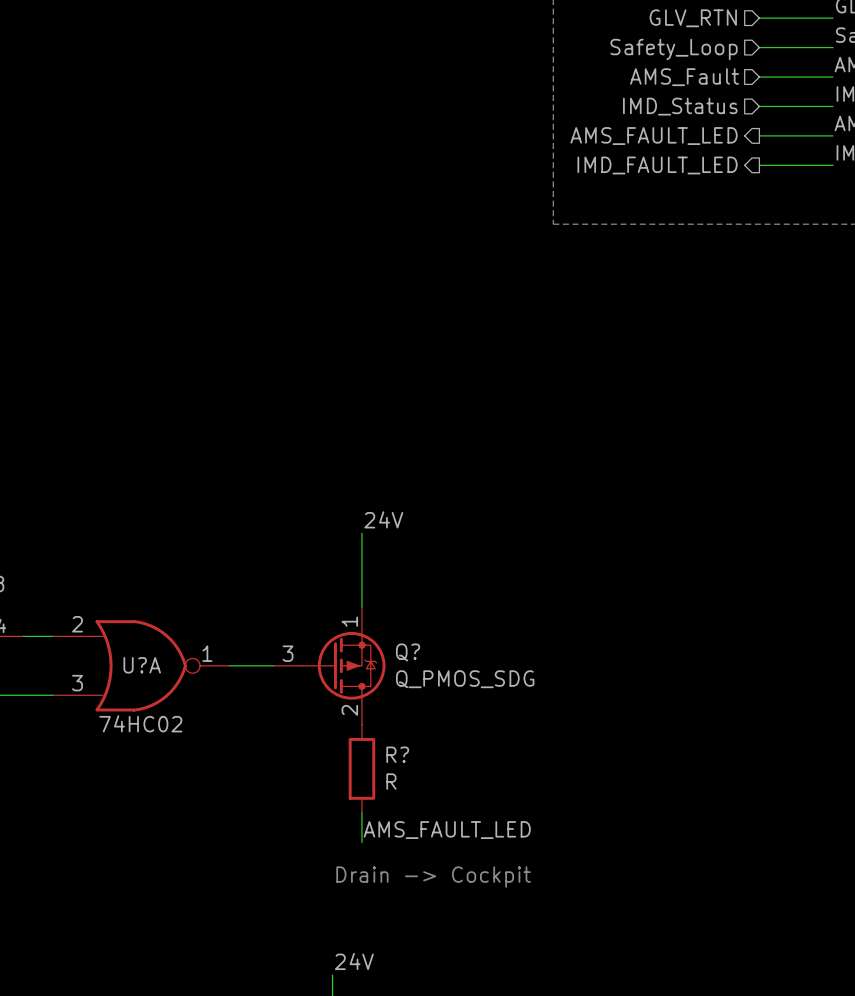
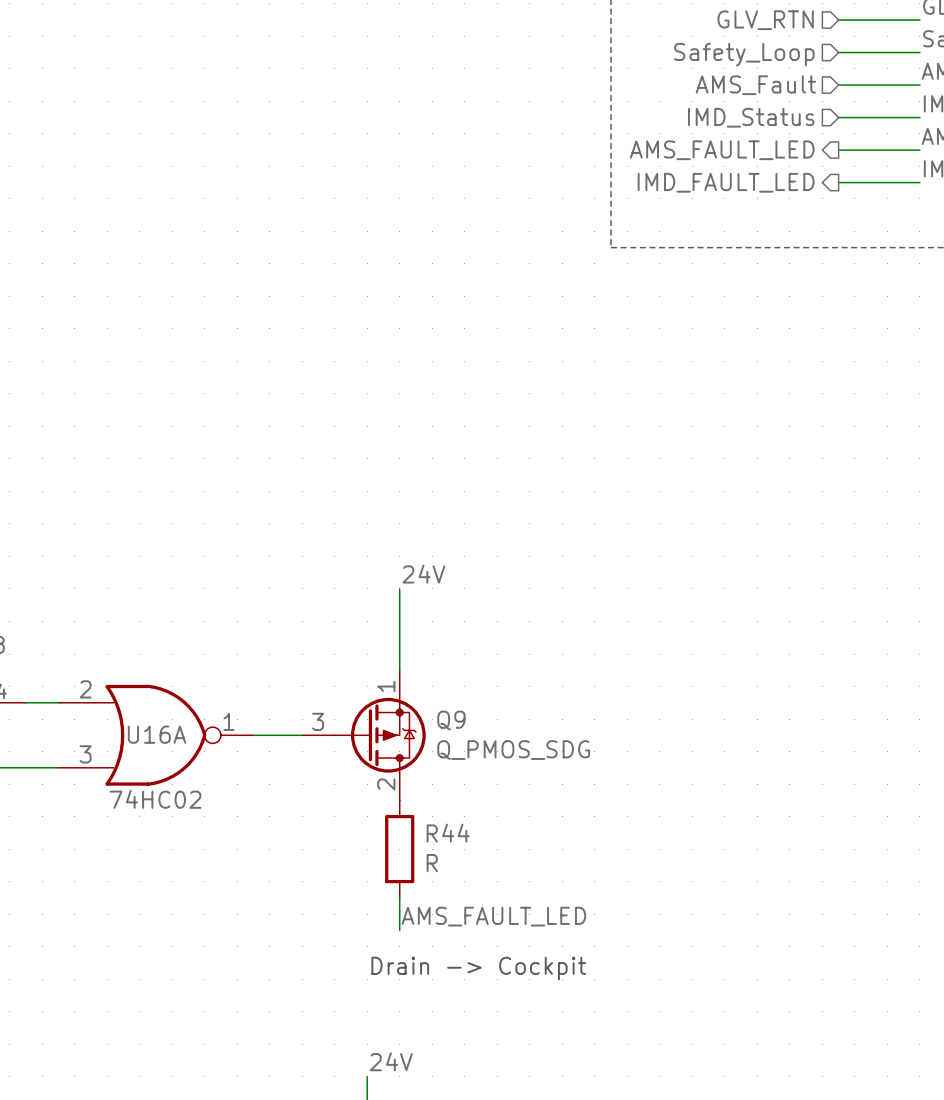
Q? name: Q? (408, 652) -> Q9 (451, 720)
U?A name: U?A (142, 665) -> U16A (157, 734)
R? name: R? (397, 754) -> R44 (448, 833)

